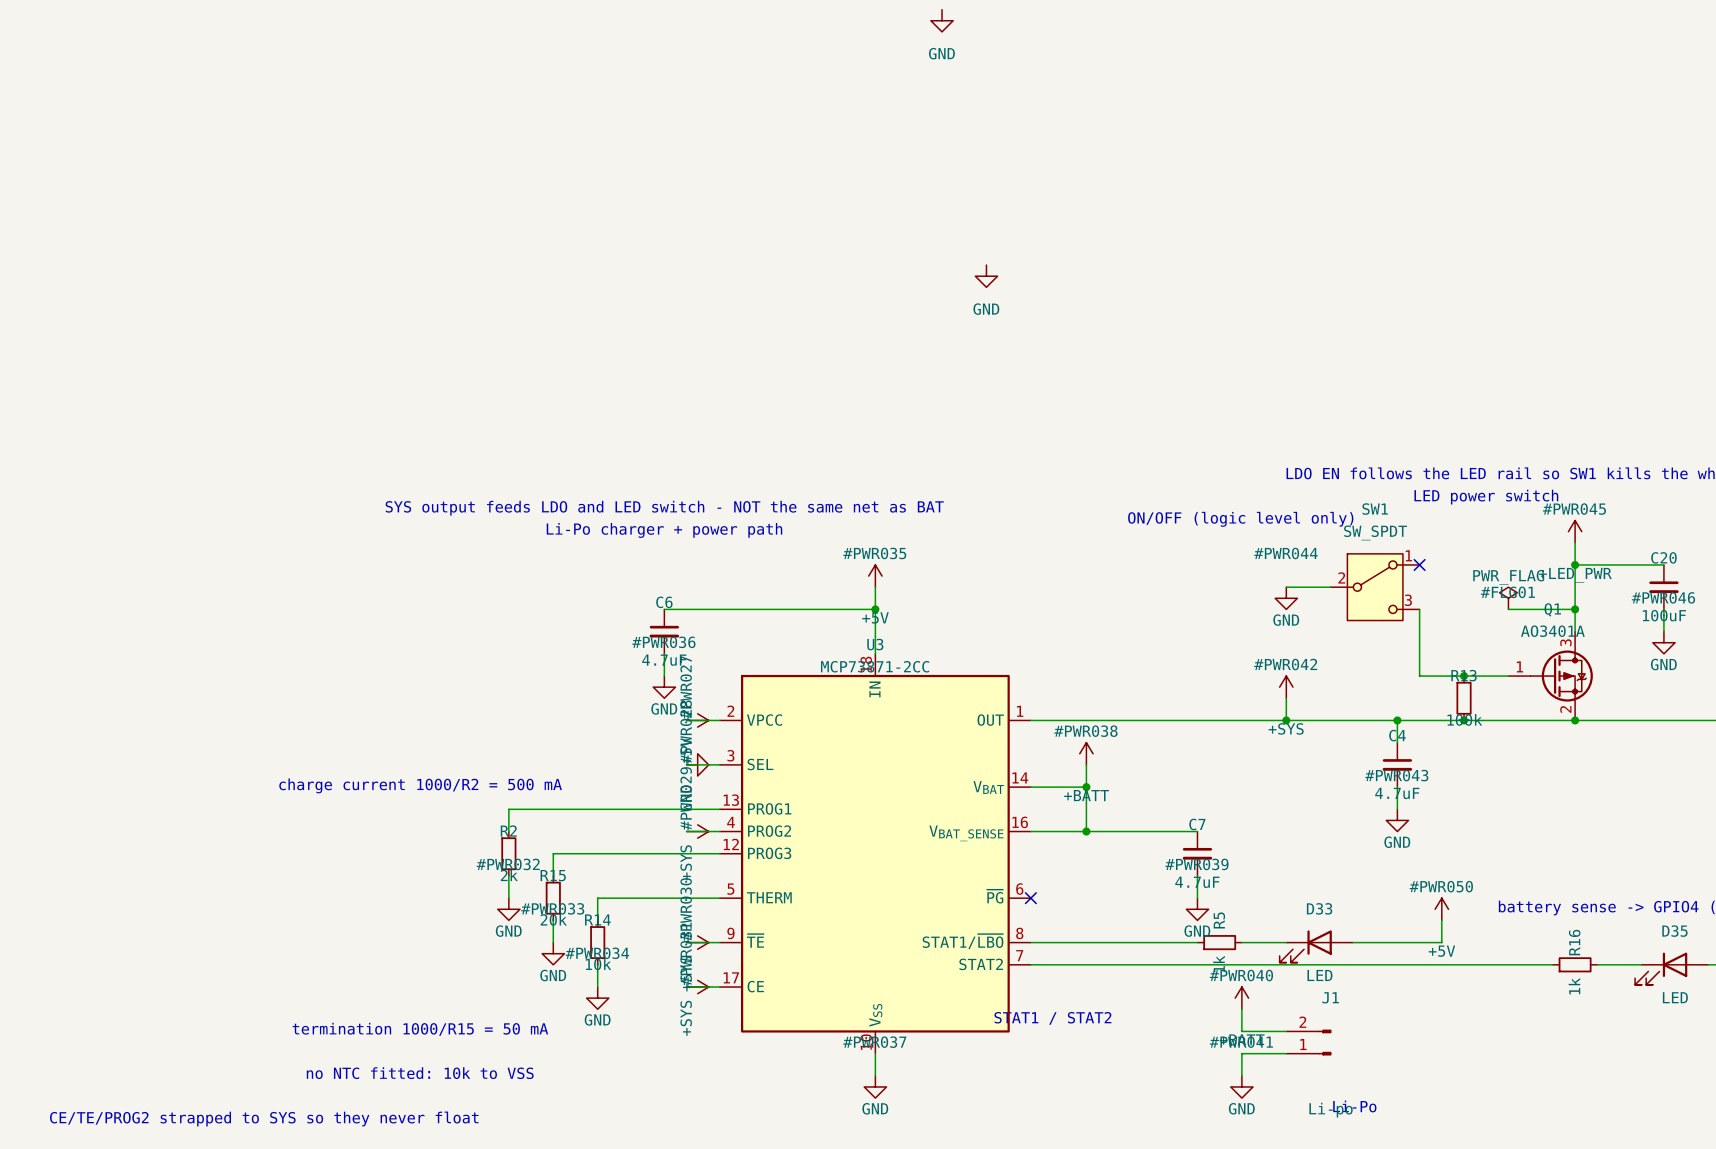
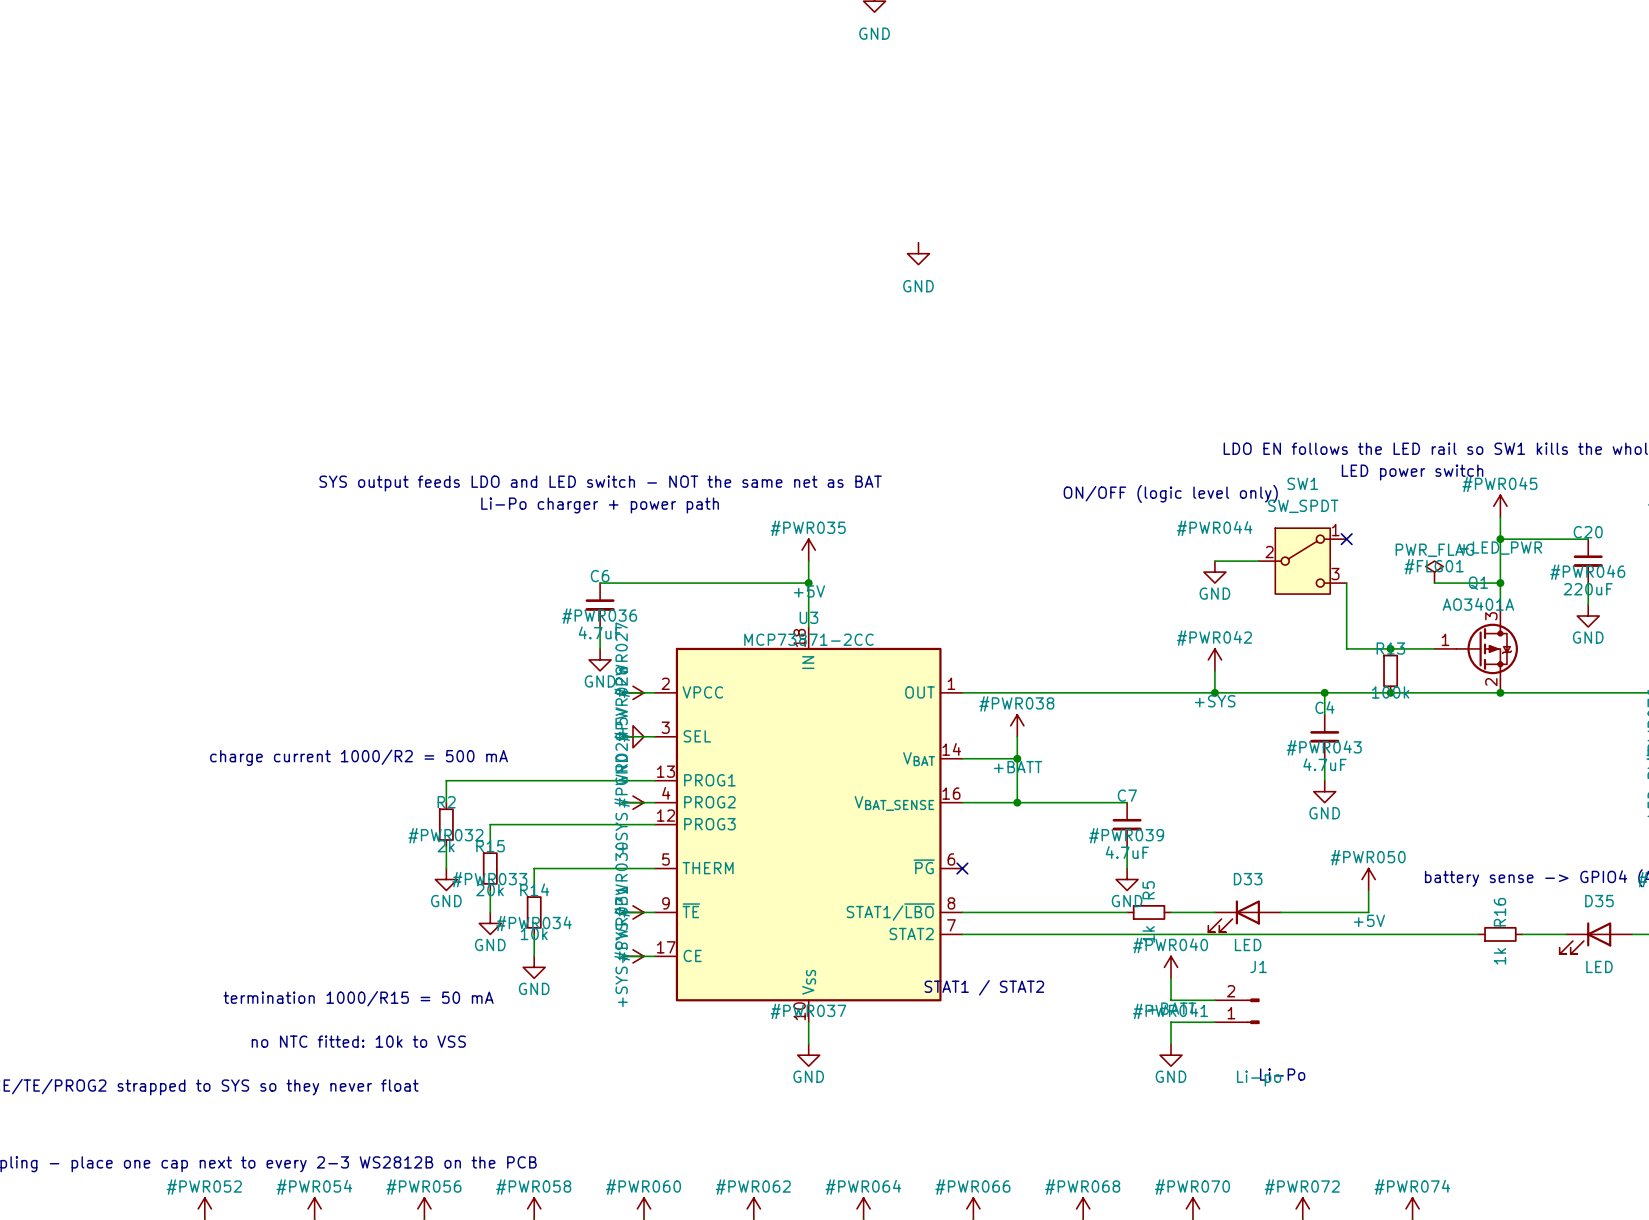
C20 value: 100uF (1664, 615) -> 220uF (1588, 589)

